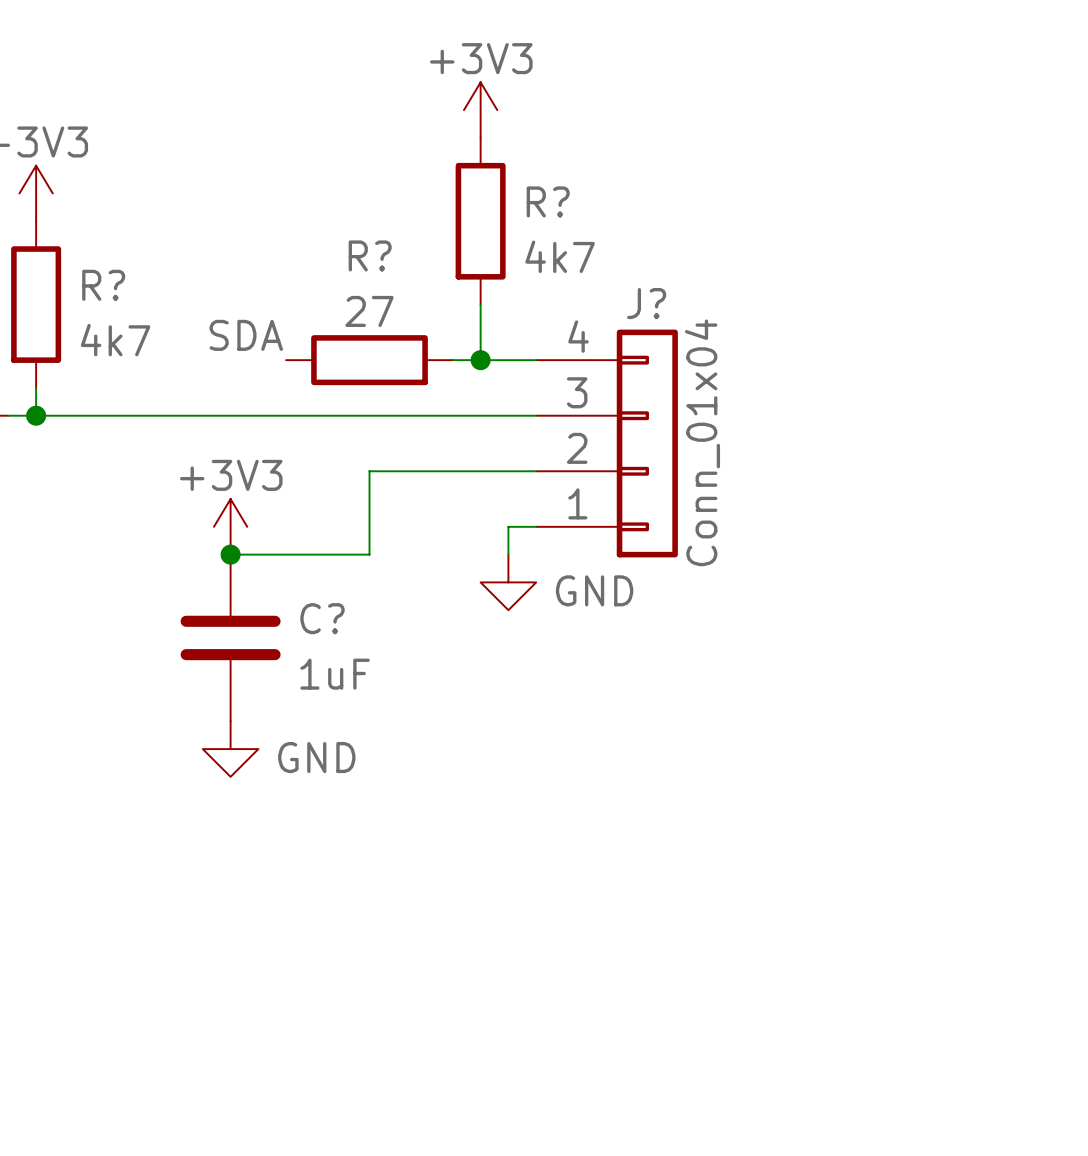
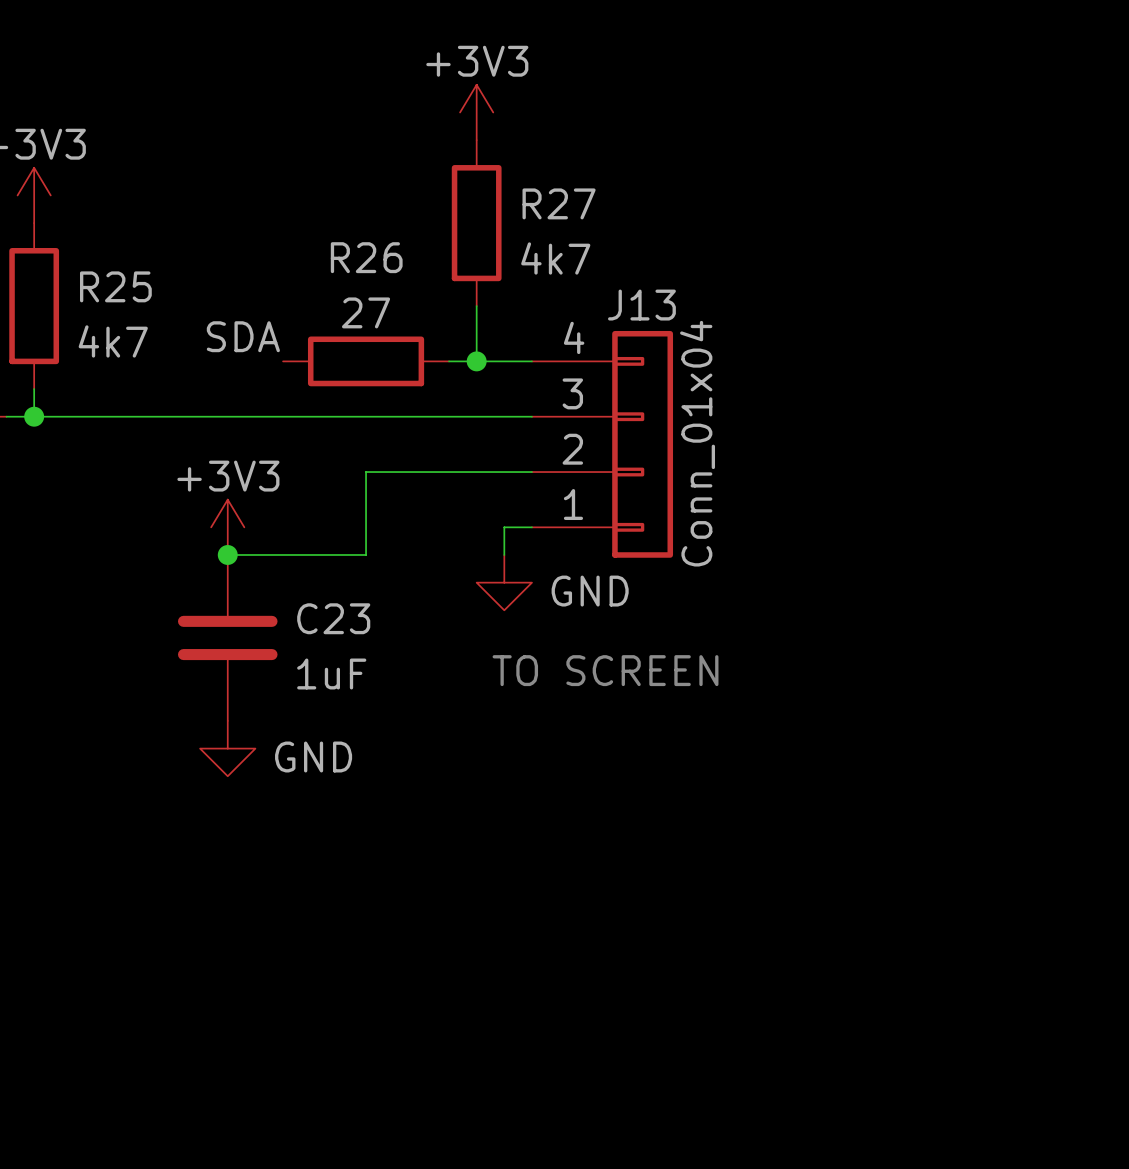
R? name: R? (548, 201) -> R27 (559, 203)
R? name: R? (370, 255) -> R26 (366, 257)
R? name: R? (103, 285) -> R25 (115, 286)
J? name: J? (646, 303) -> J13 (641, 305)
C? name: C? (322, 618) -> C23 (333, 618)
text: none -> TO SCREEN (605, 670)

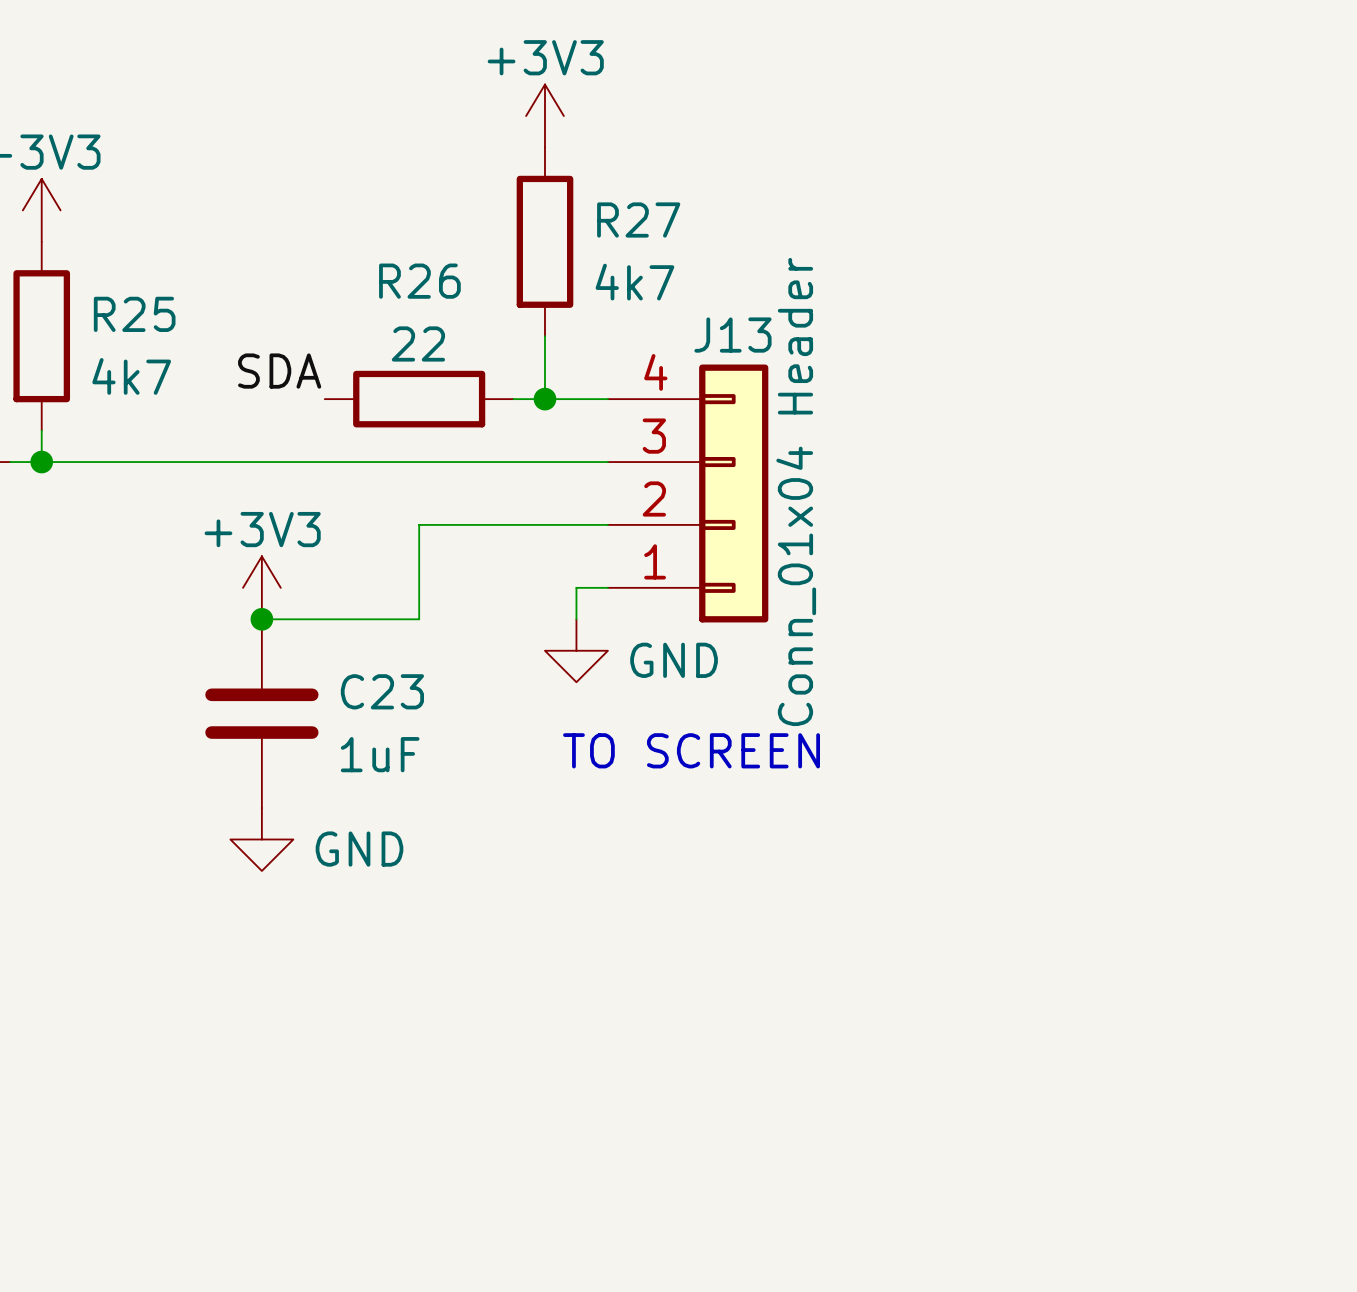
R26 value: 27 (366, 312) -> 22 (418, 343)
J13 value: Conn_01x04 (697, 443) -> Conn_01x04 Header (796, 491)

